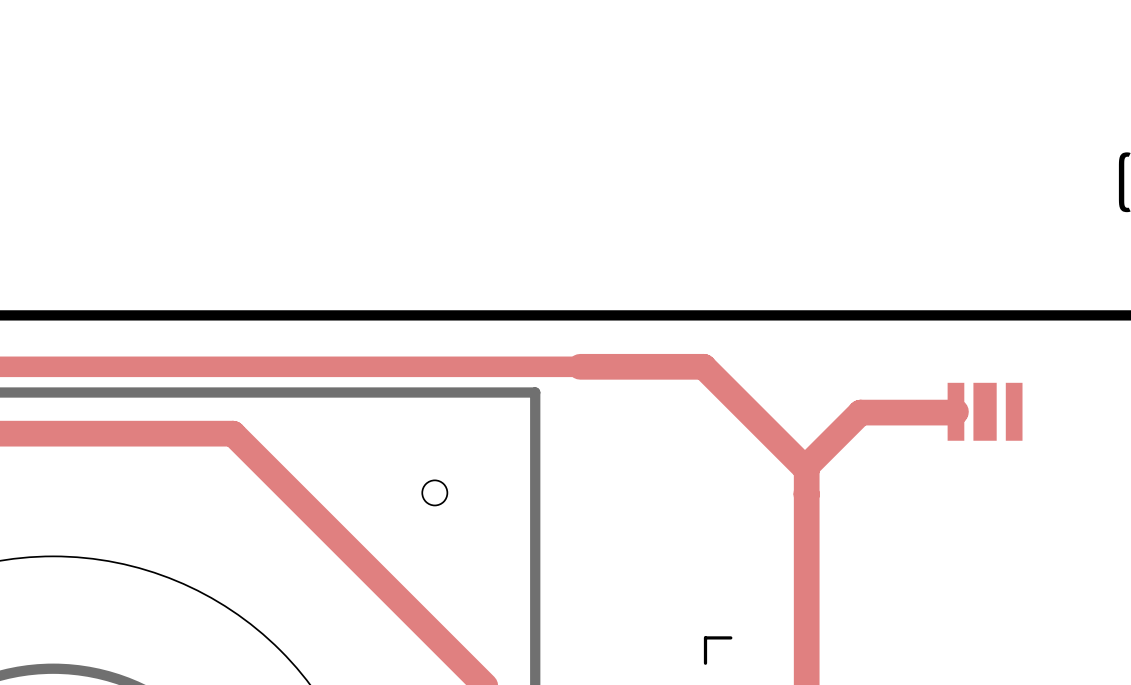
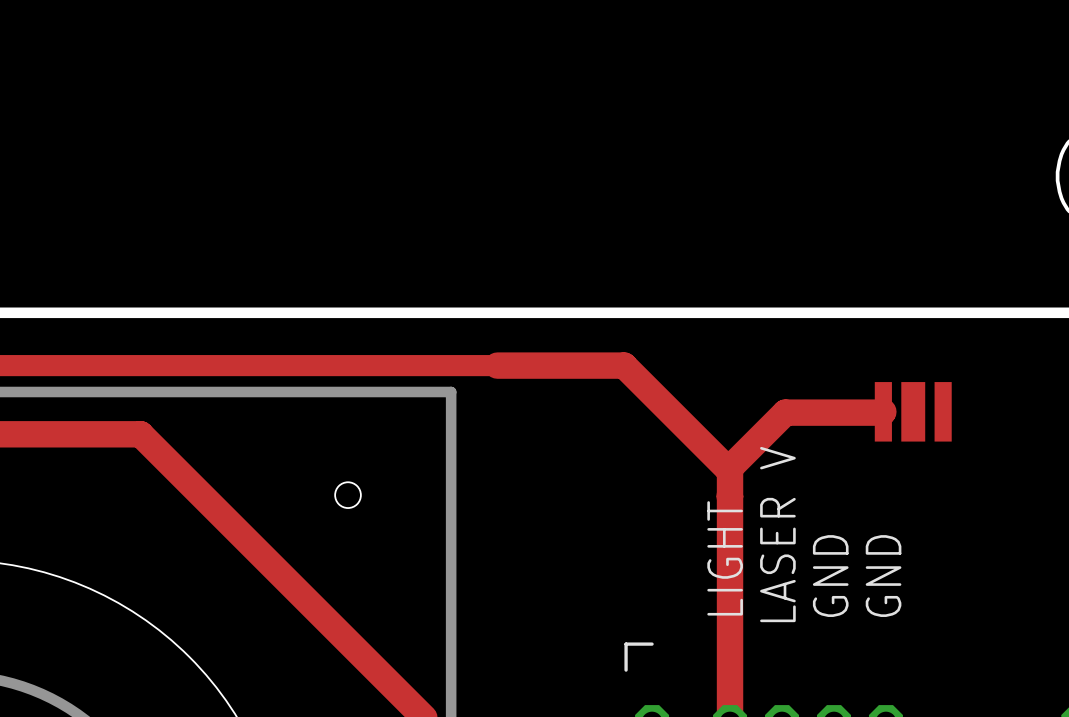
text: none -> LASER V (777, 534)
text: none -> LIGHT (725, 558)
text: none -> GND (830, 576)
text: none -> GND (883, 576)

